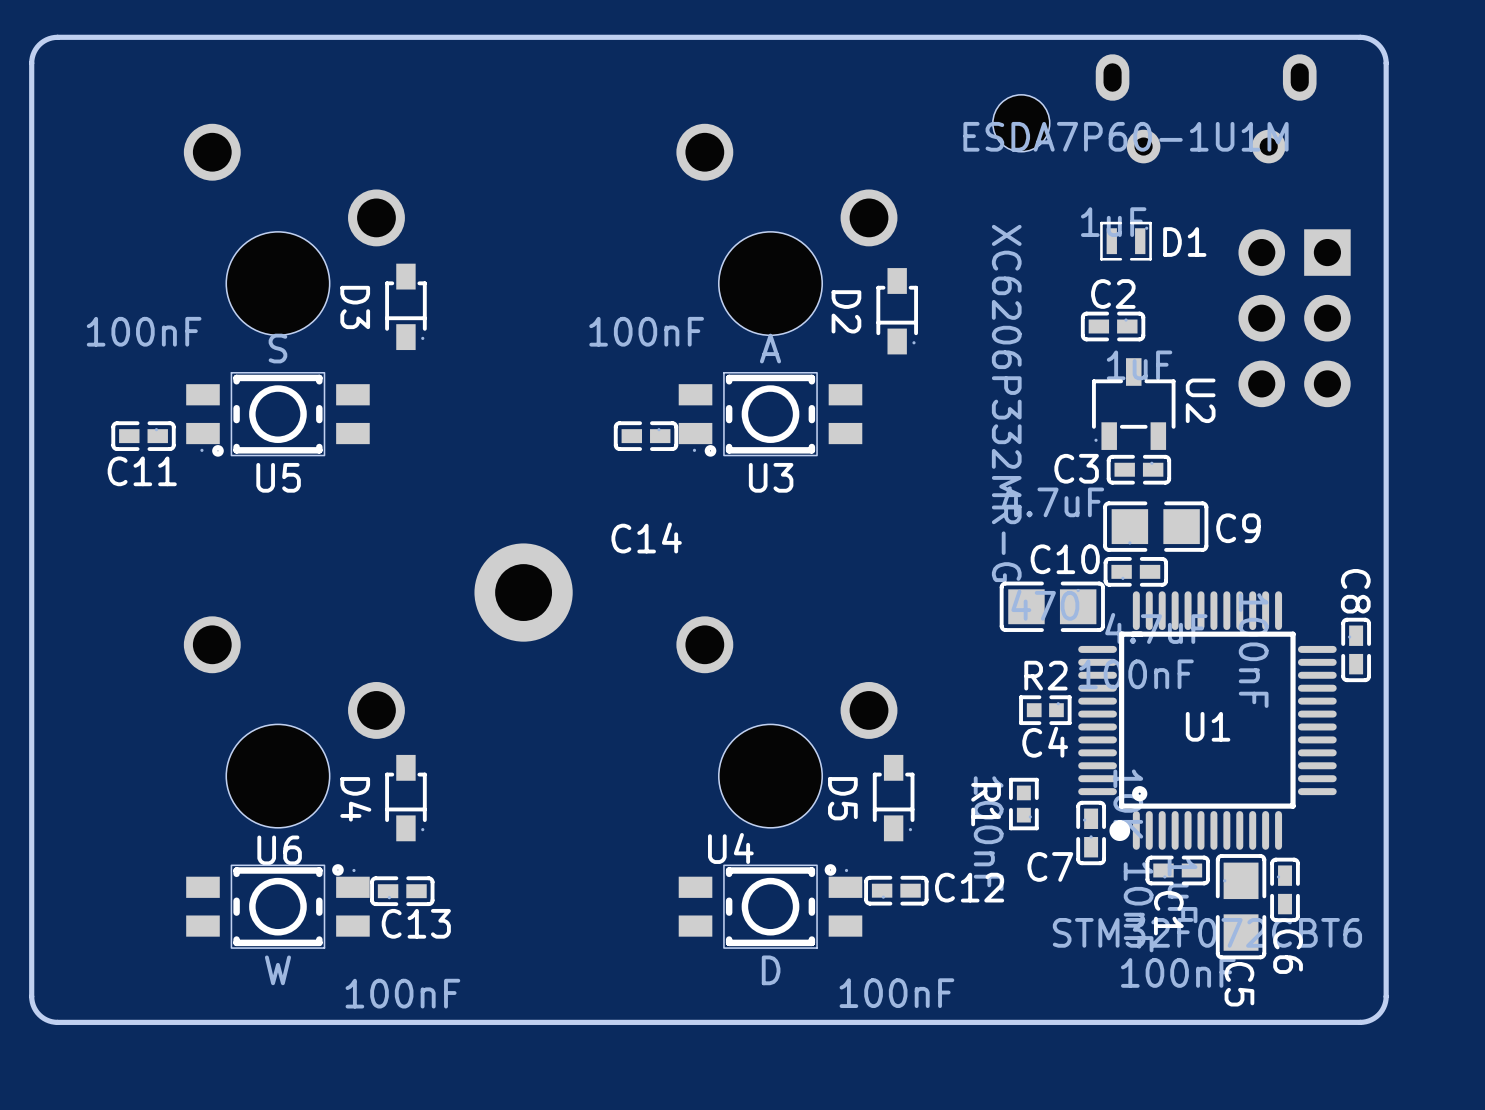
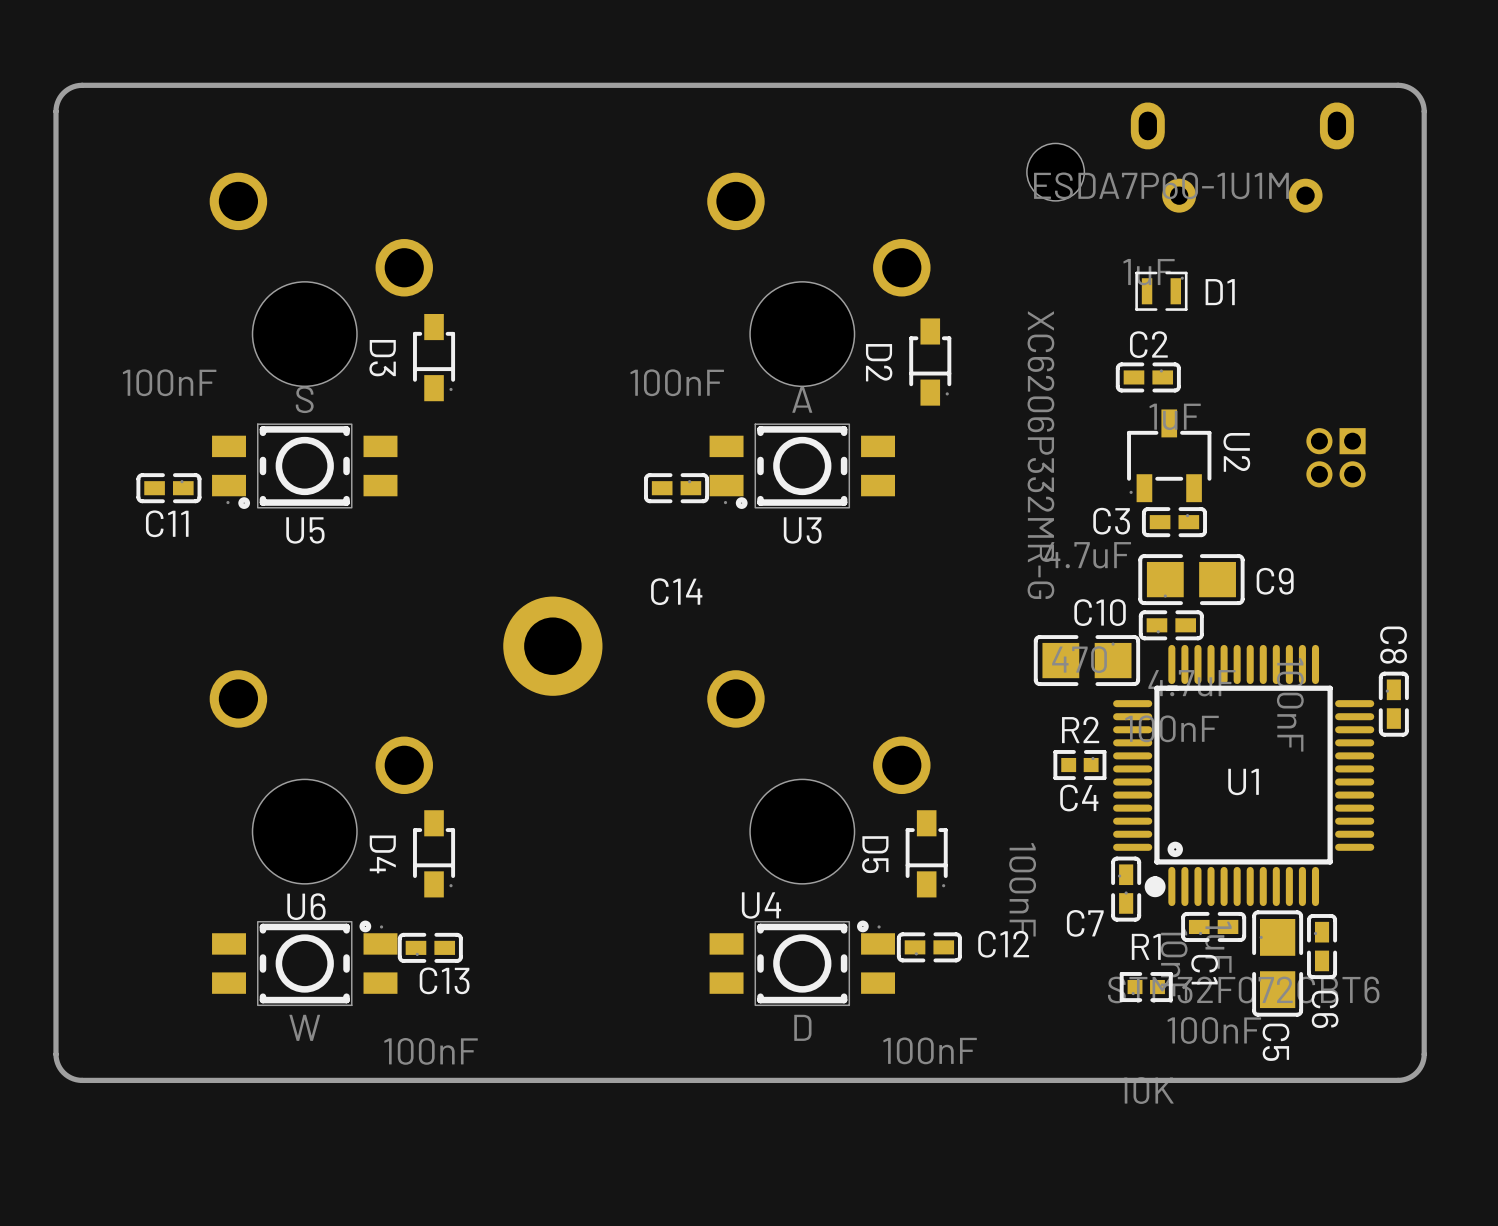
part: (1294, 318) -> none
part: none -> (1336, 457)
R1 rotation: 0° (1023, 804) -> 90° clockwise (1146, 987)
R1 position: (1023, 804) -> (1146, 987)

